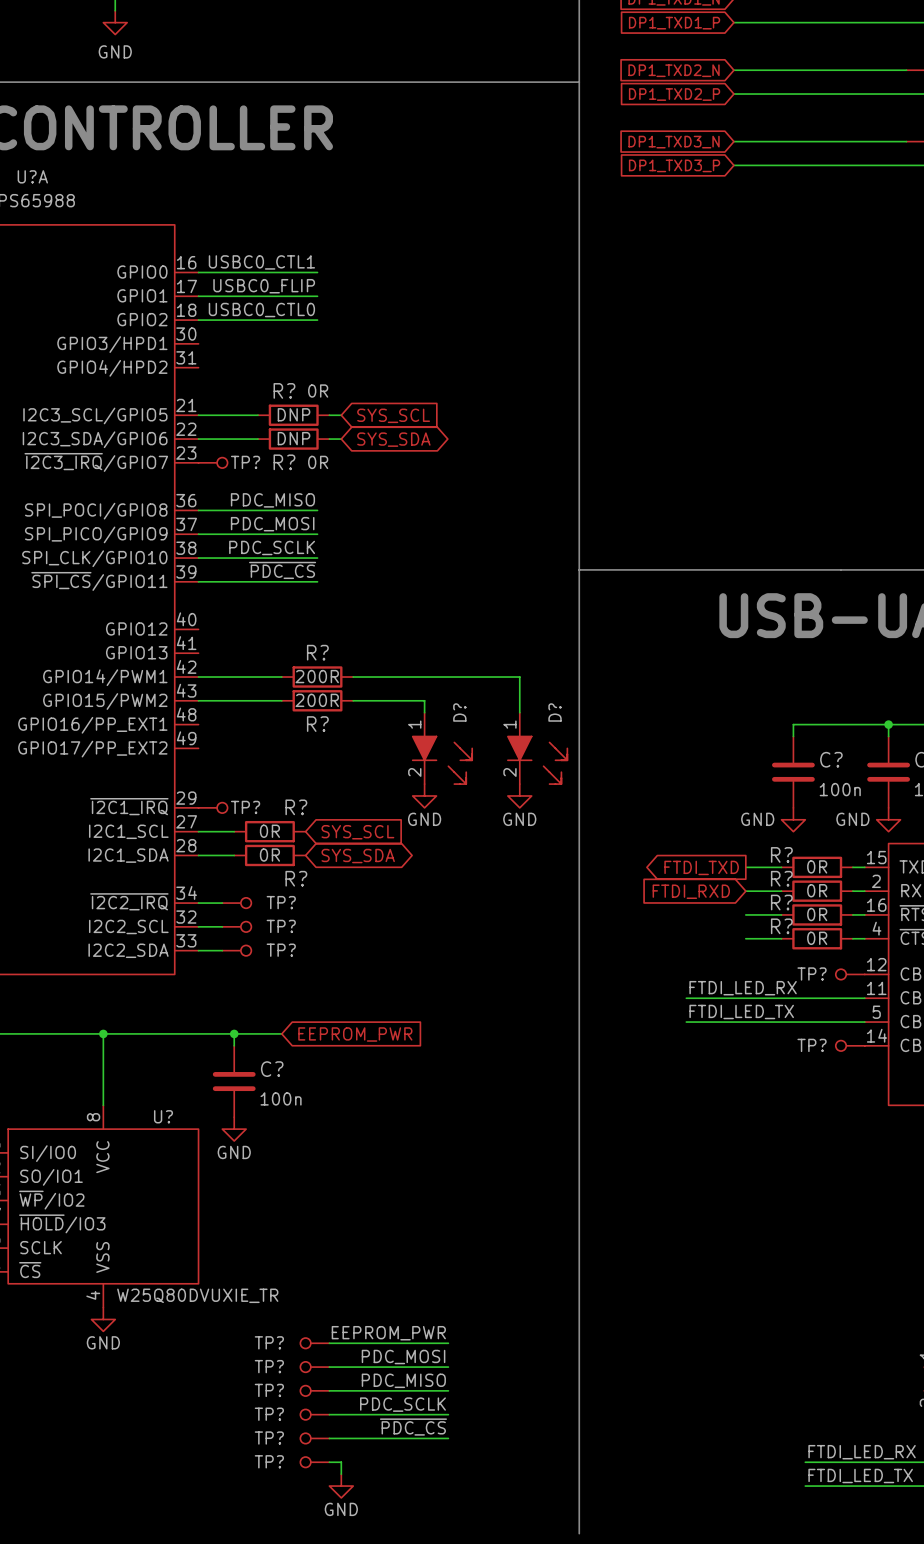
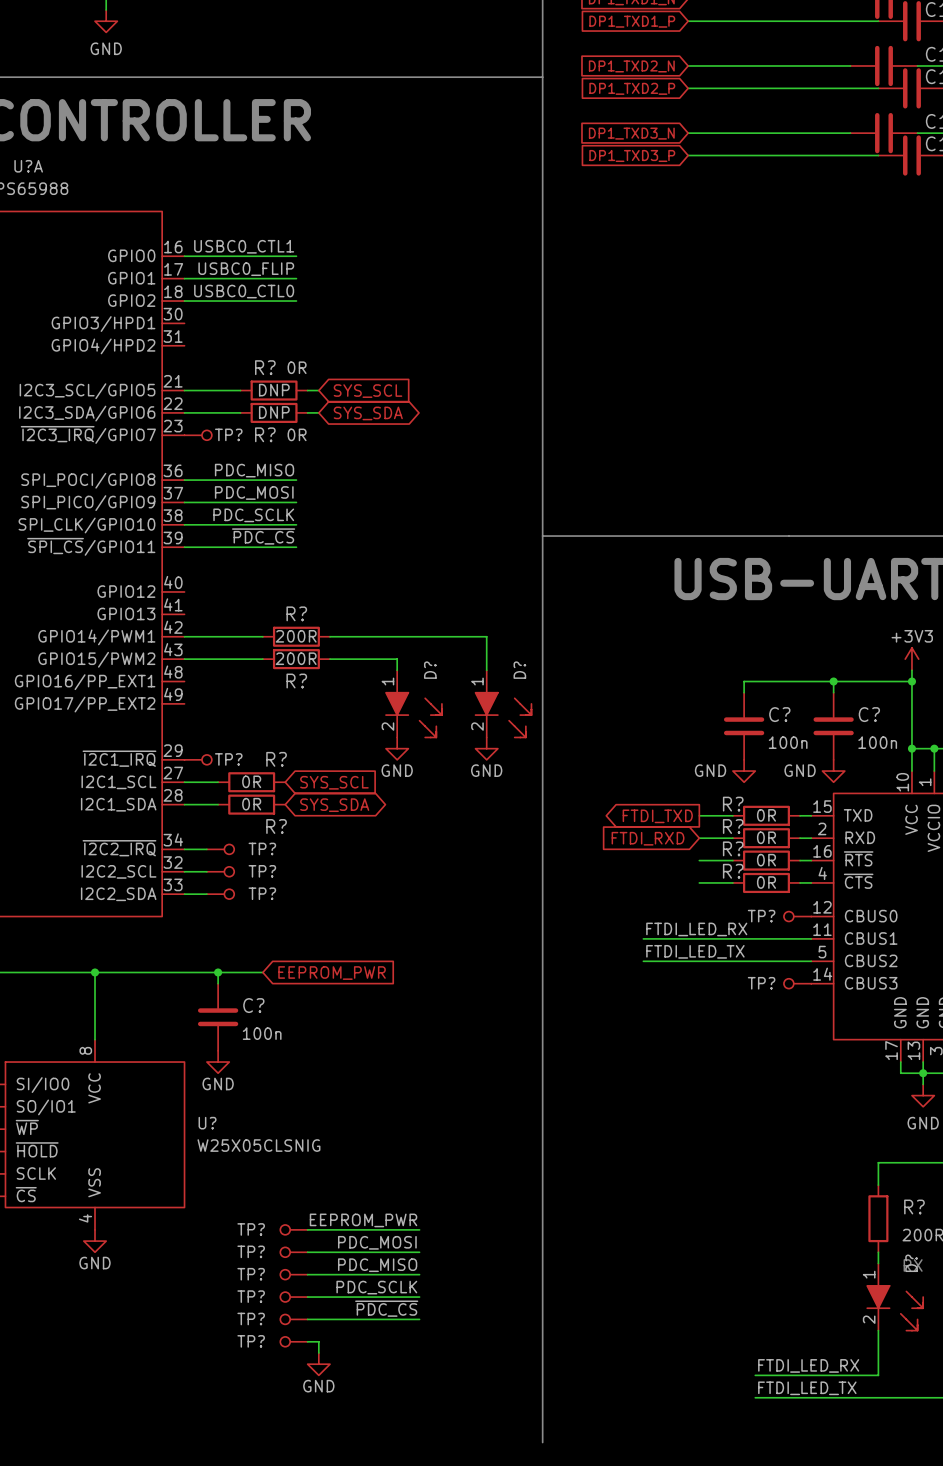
U? name position: U? (163, 1116) -> U? (207, 1123)
U? pin name: ~{WP}/IO2 (51, 1200) -> ~{WP} (27, 1127)
U? pin name: ~{HOLD}/IO3 (62, 1223) -> ~{HOLD} (37, 1149)
U? value: W25Q80DVUXIE_TR (197, 1295) -> W25X05CLSNIG (258, 1145)
TP?: none -> (293, 1229)
TP?: none -> (293, 1252)
label position: EEPROM_PWR (388, 1333) -> EEPROM_PWR (363, 1220)
TP?: (314, 1343) -> none
wire: (329, 1343) (448, 1343) -> (307, 1229) (419, 1229)
TP?: none -> (293, 1274)
label position: PDC_MOSI (403, 1357) -> PDC_MOSI (377, 1242)
TP?: (314, 1367) -> none
wire: (329, 1367) (448, 1367) -> (307, 1252) (419, 1252)
TP?: none -> (293, 1297)
label position: PDC_MISO (403, 1380) -> PDC_MISO (377, 1265)
TP?: (314, 1390) -> none
wire: (329, 1390) (448, 1390) -> (307, 1274) (419, 1274)
TP?: none -> (293, 1319)
label position: PDC_SCLK (402, 1404) -> PDC_SCLK (376, 1287)
TP?: (314, 1414) -> none
wire: (329, 1414) (448, 1414) -> (307, 1297) (419, 1297)
TP?: none -> (293, 1341)
label position: ~{PDC_CS} (413, 1427) -> ~{PDC_CS} (386, 1308)
TP?: (314, 1438) -> none
wire: (329, 1438) (448, 1438) -> (307, 1319) (419, 1319)
TP?: (314, 1462) -> none
wire: (329, 1462) (341, 1462) (341, 1474) -> (307, 1341) (318, 1341) (318, 1353)
power symbol position: GND (341, 1486) -> GND (318, 1364)

